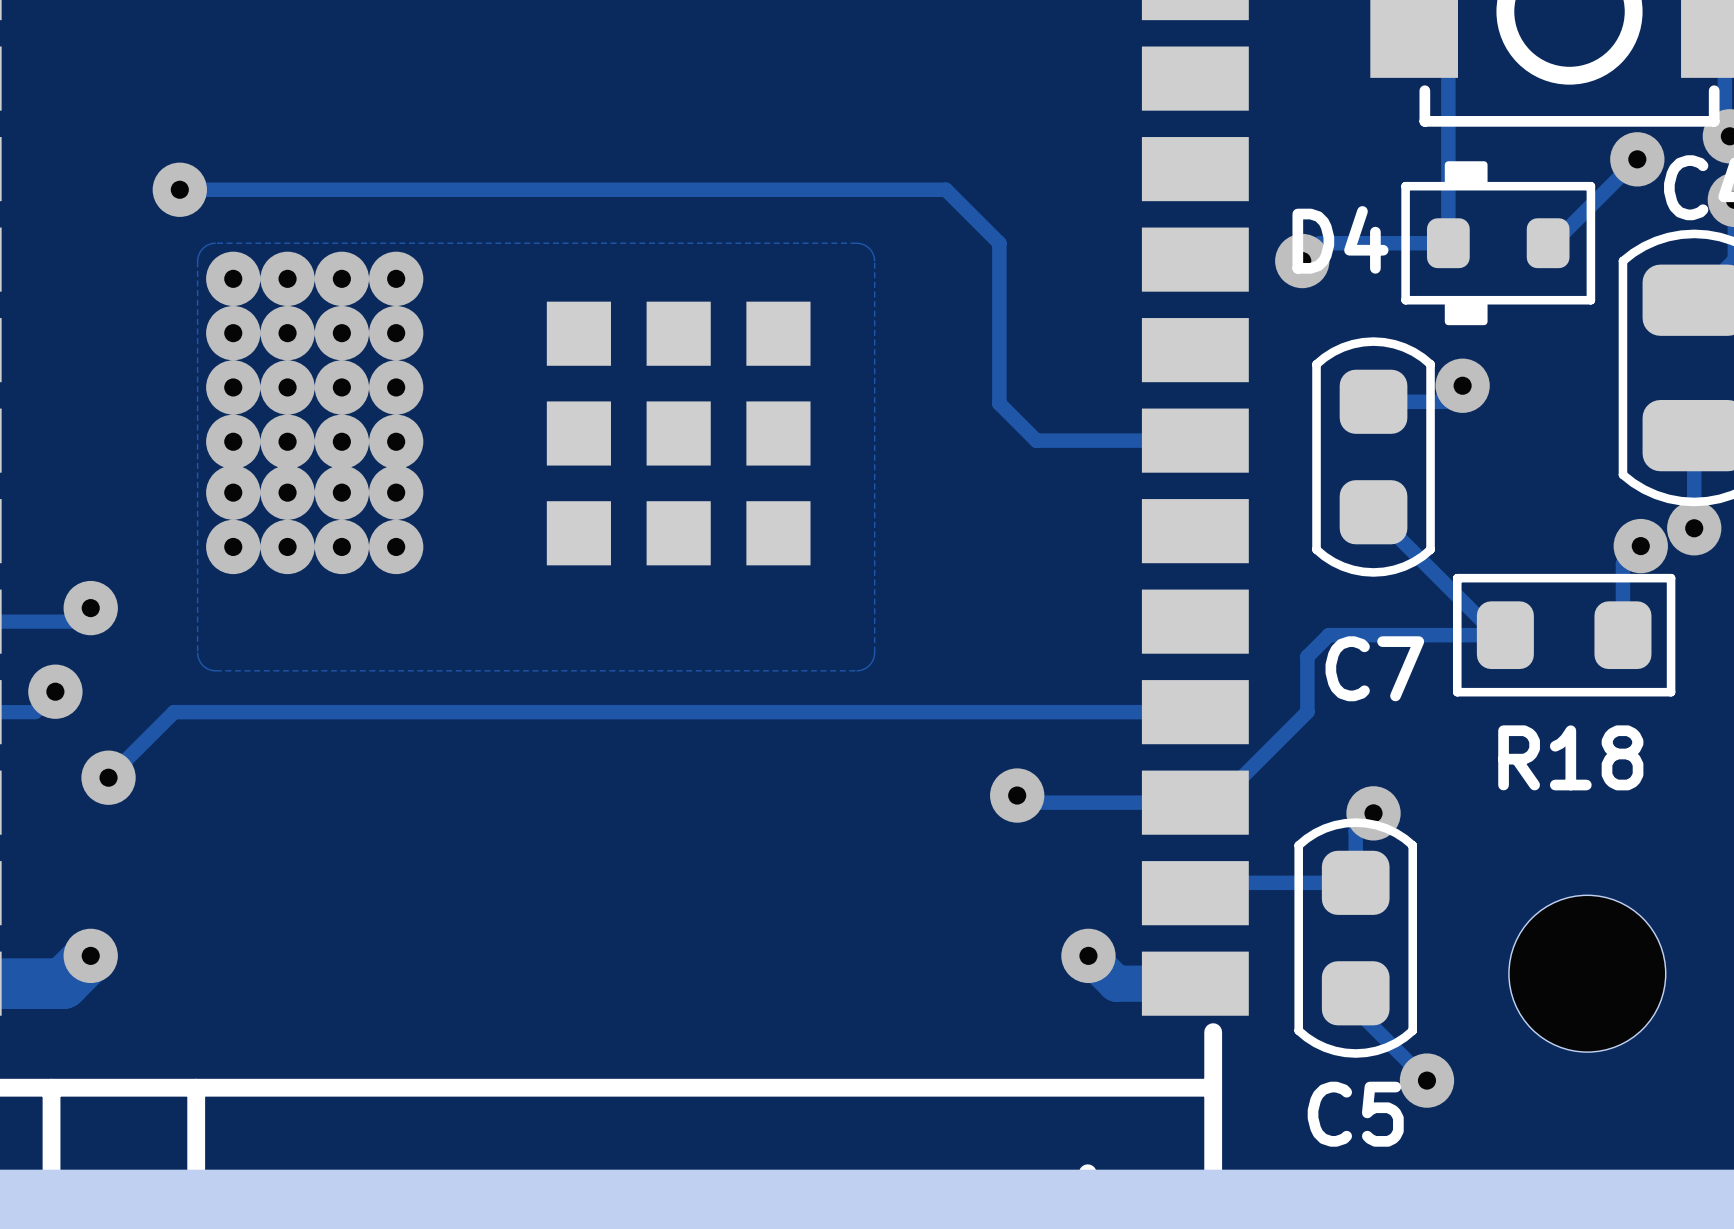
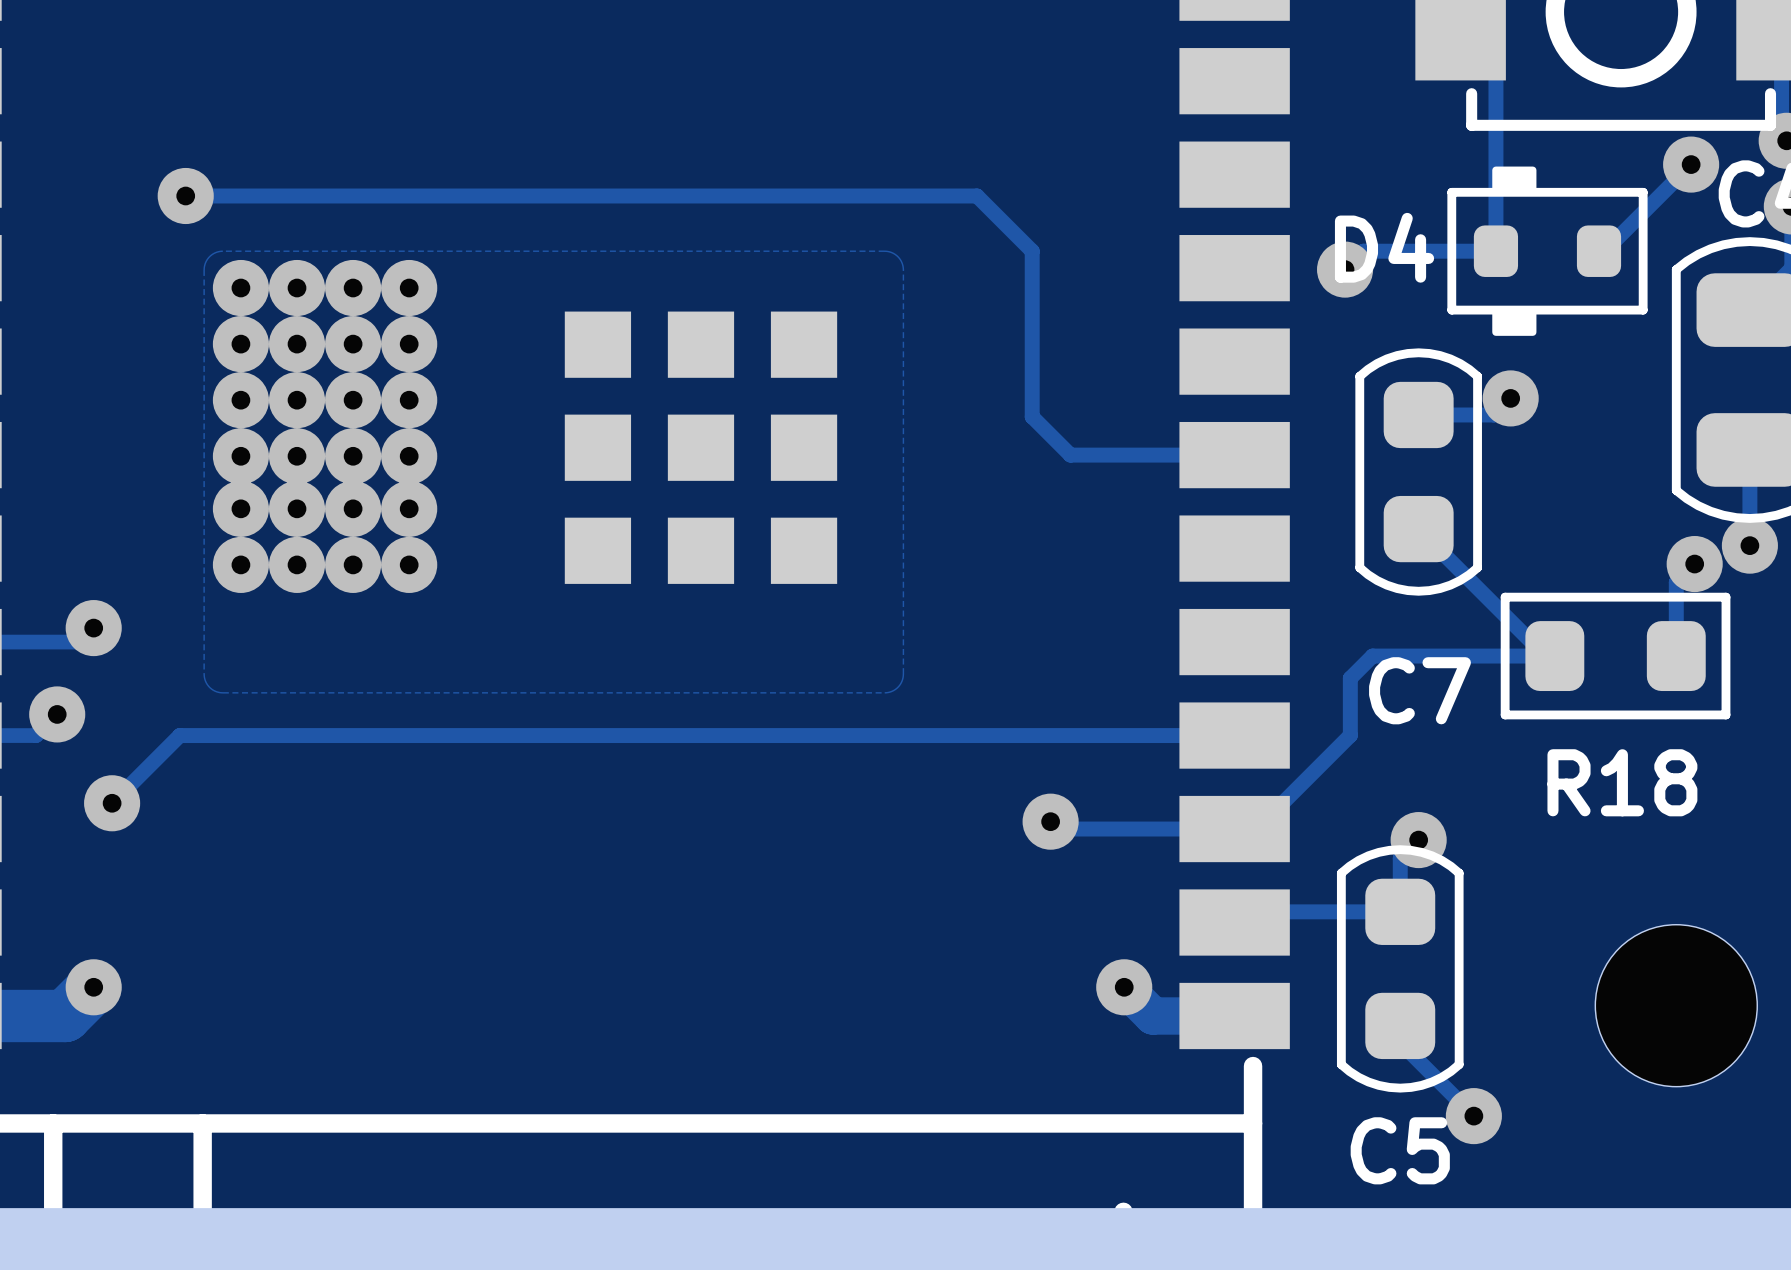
part position: (1587, 973) -> (1676, 1005)

